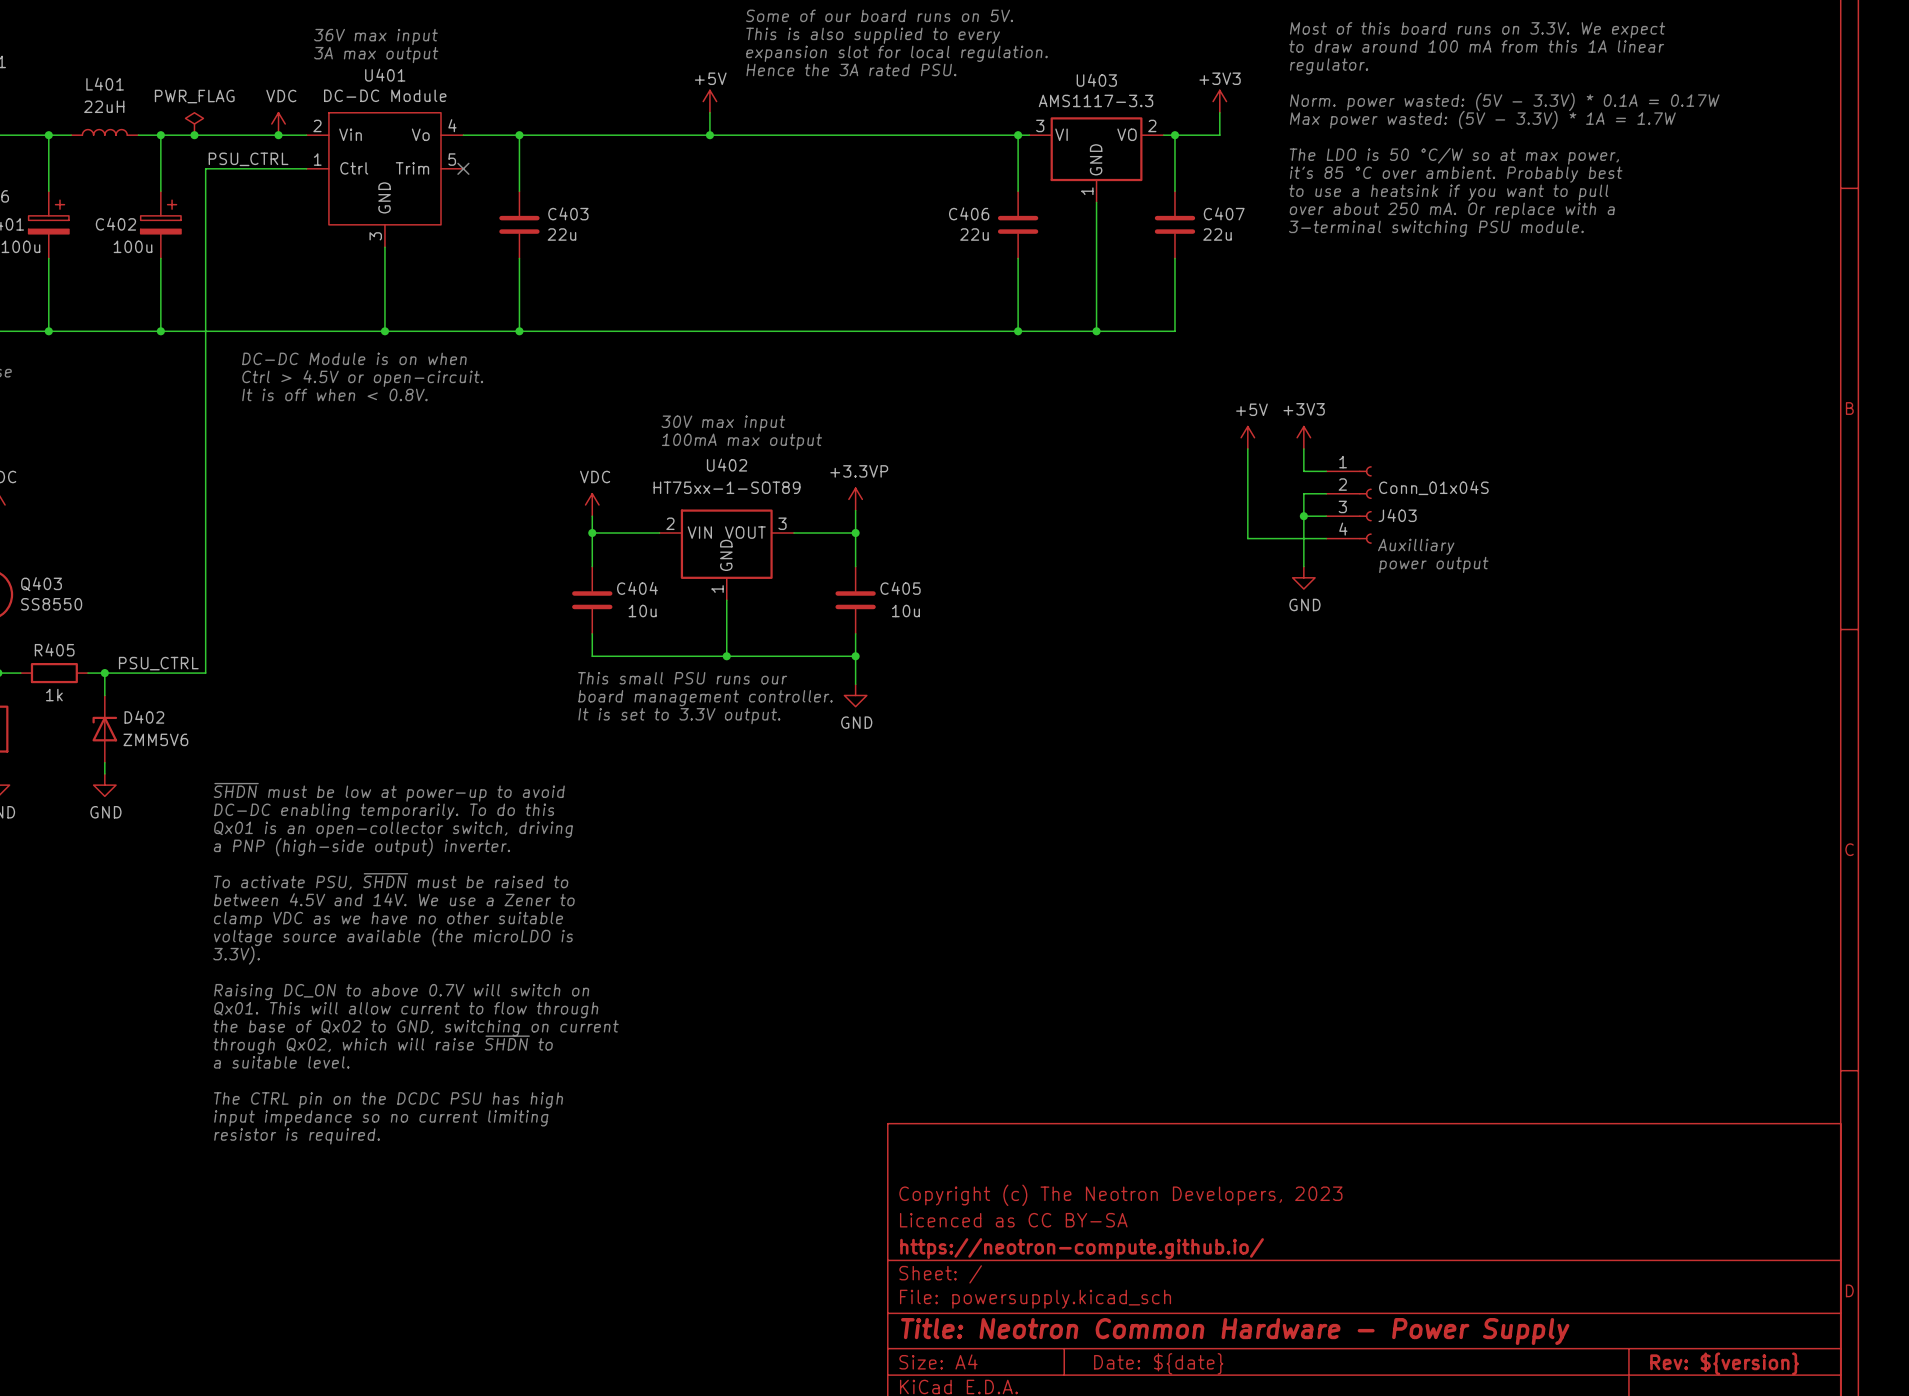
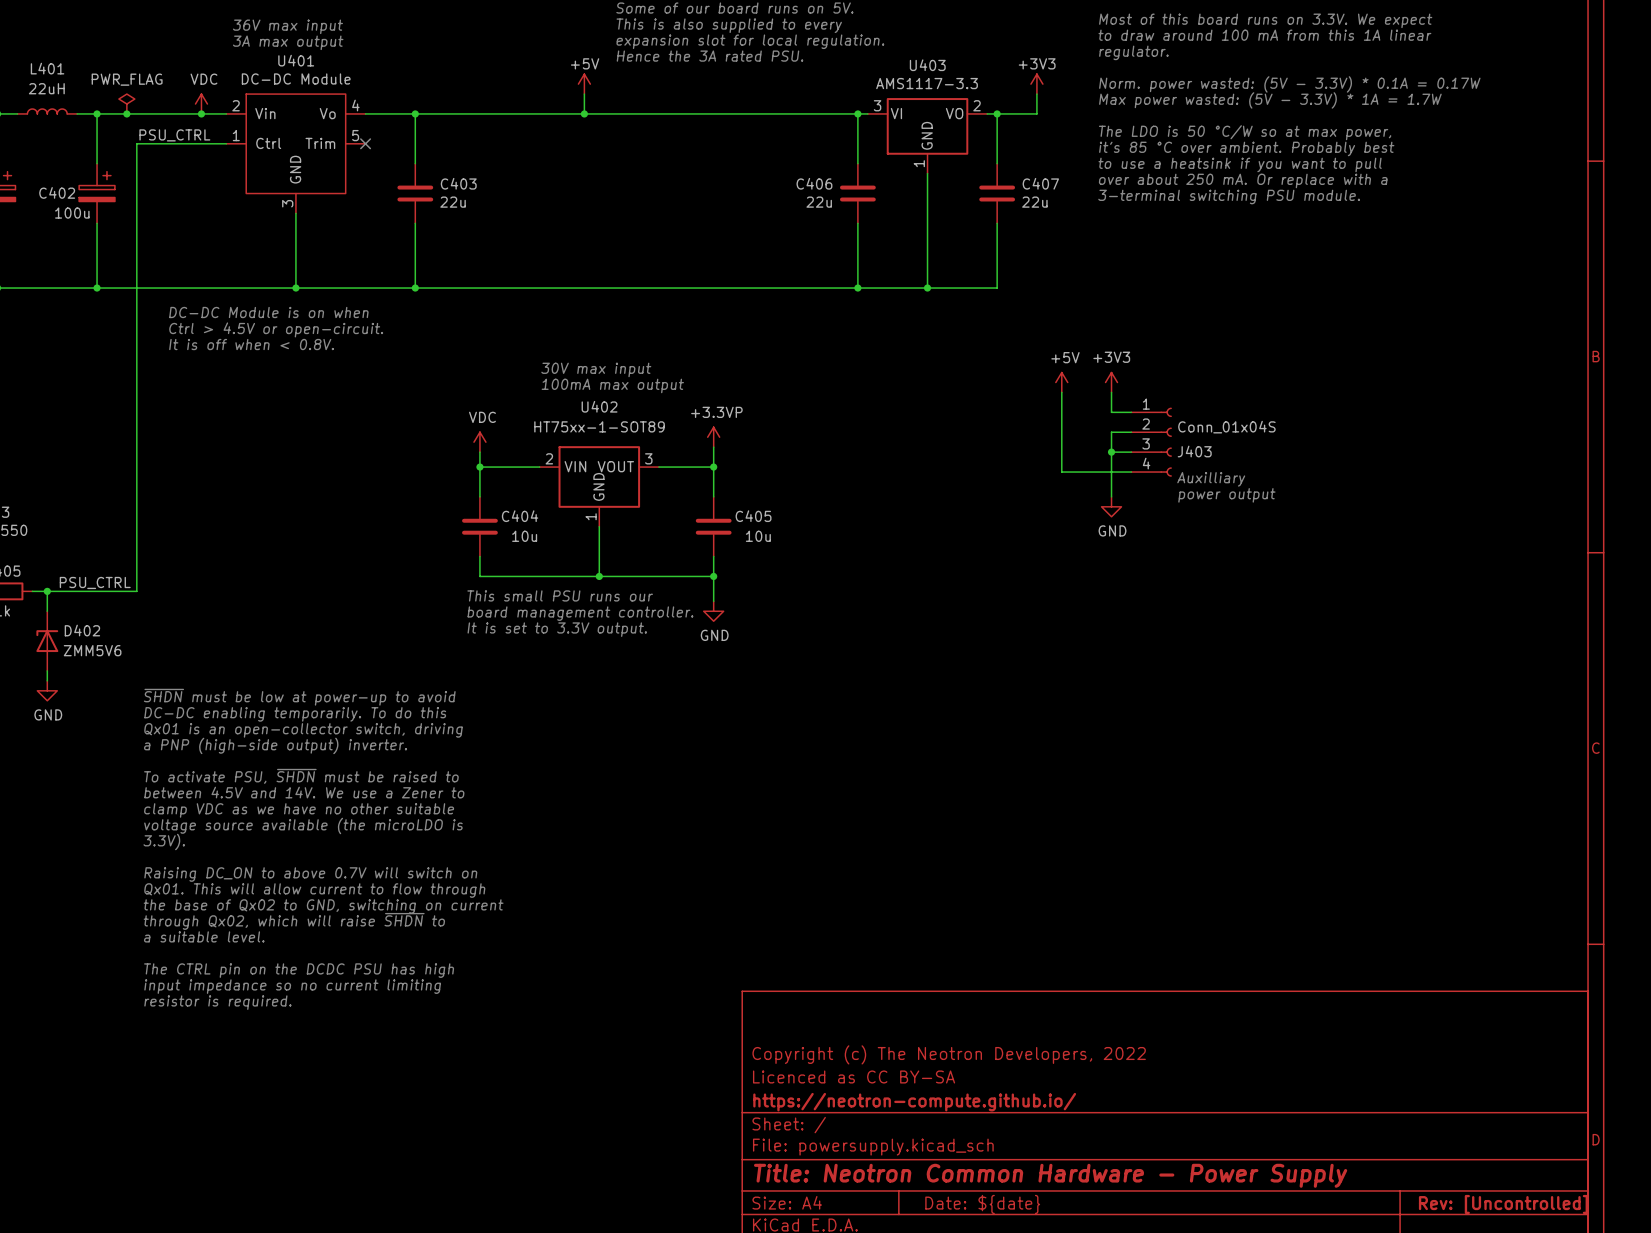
title block: Copyright (c) The Neotron Developers, 2023 (1120, 1195) -> Copyright (c) The Neotron Developers, 2022 (949, 1054)
title block: Rev: ${version} (1724, 1363) -> Rev: [Uncontrolled] (1503, 1204)

